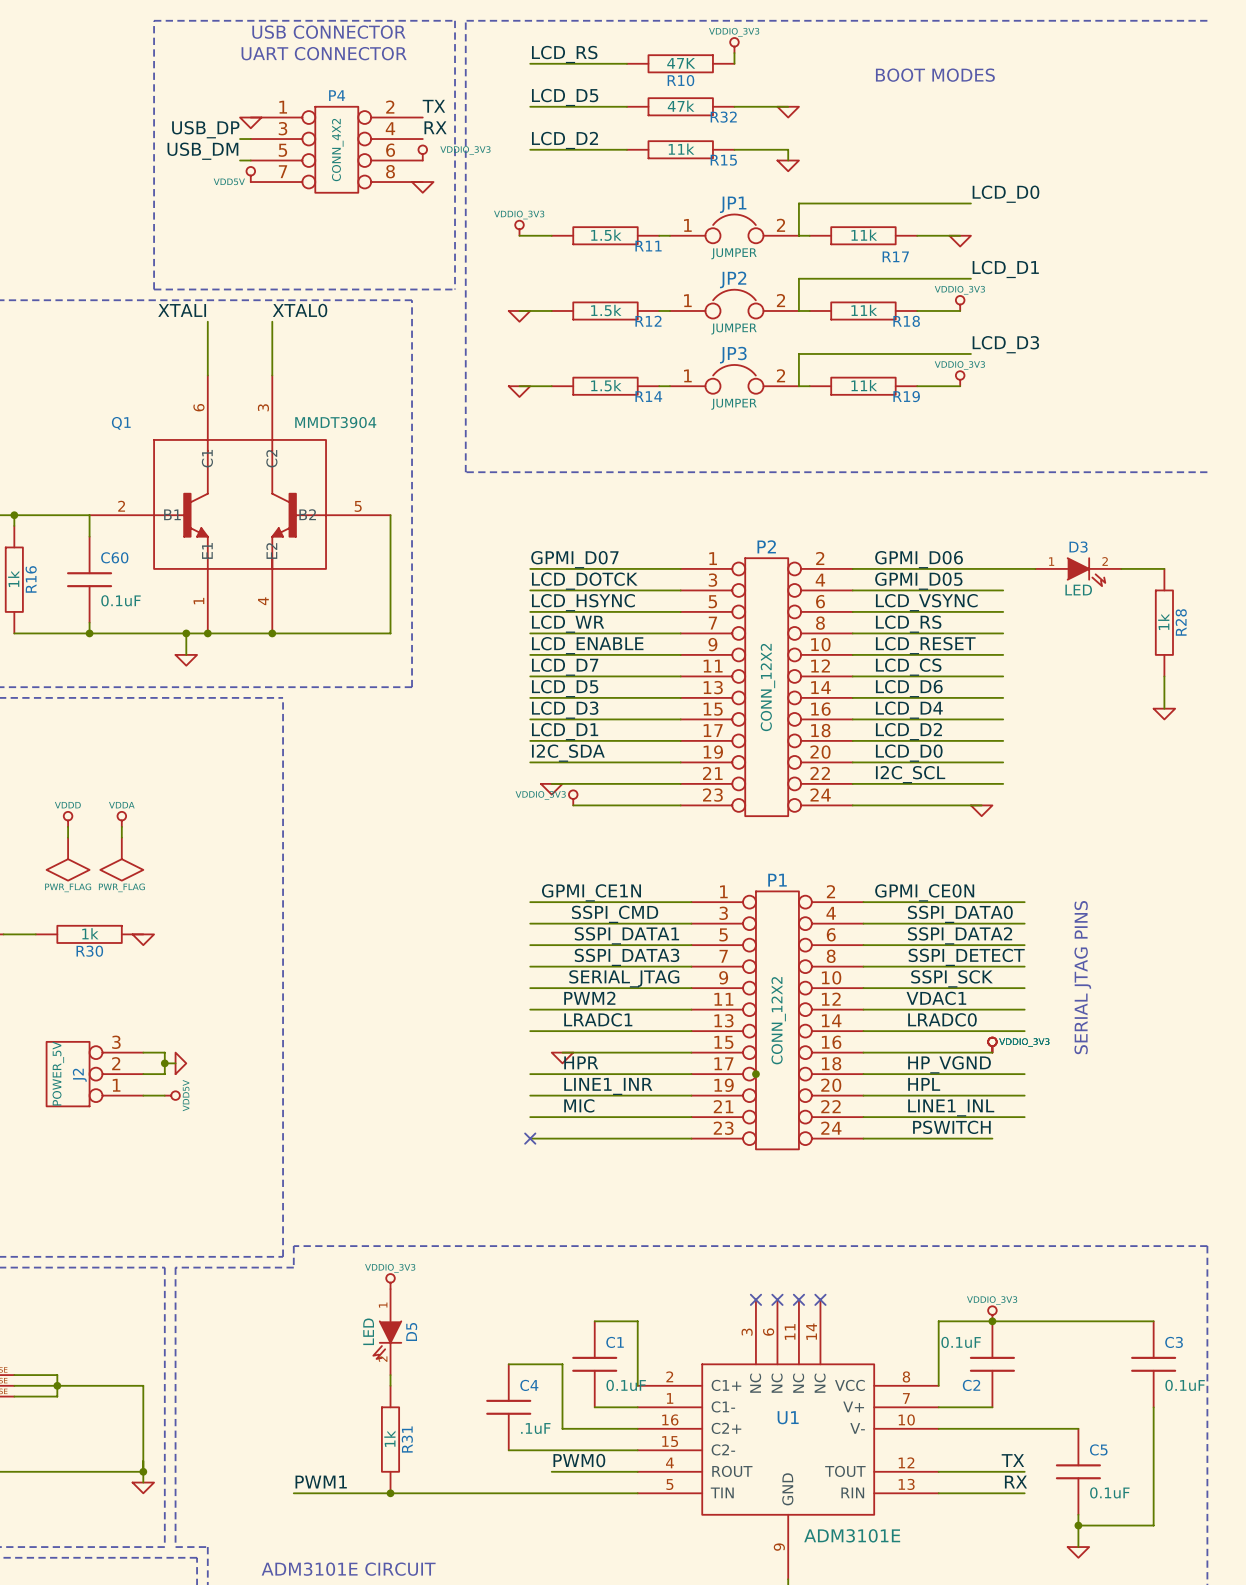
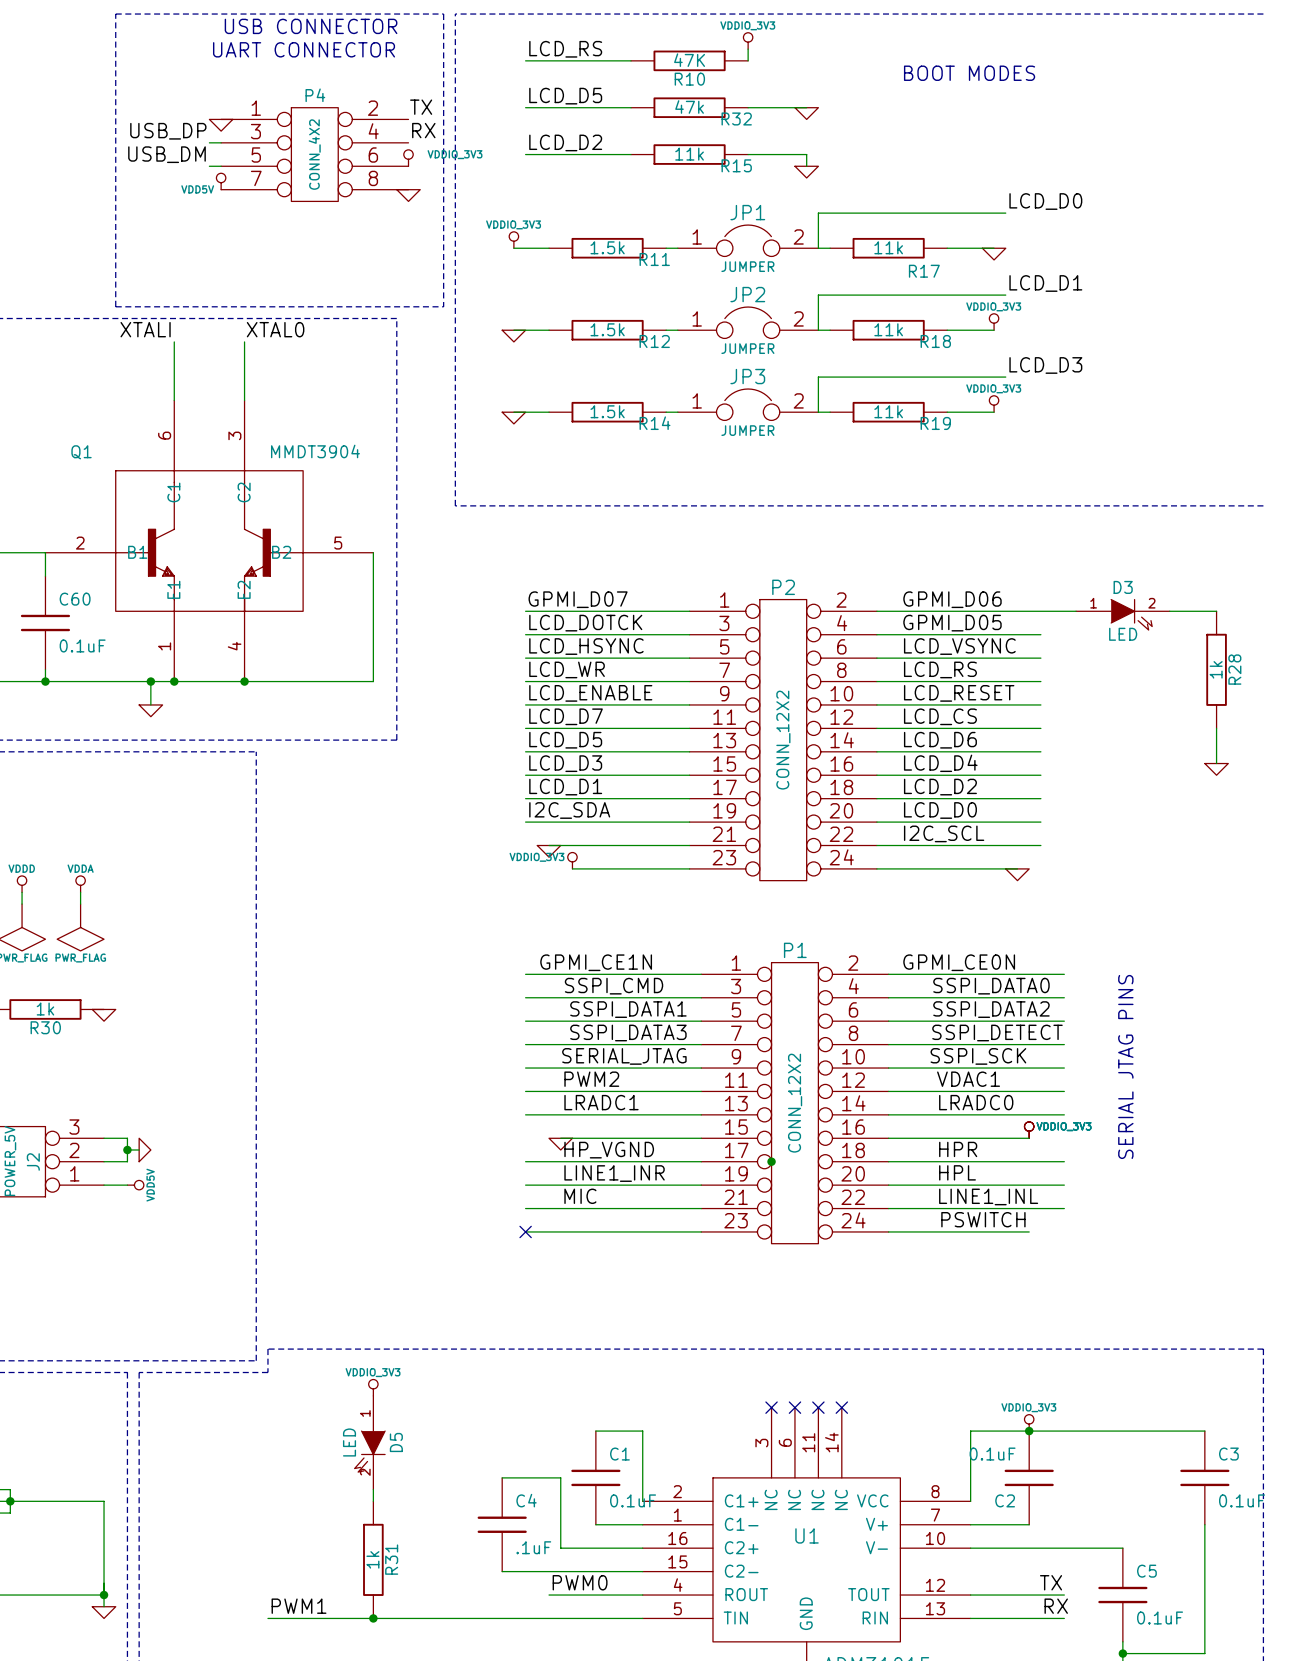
label: HPR (581, 1062) -> HP_VGND (609, 1150)
label: HP_VGND (949, 1064) -> HPR (958, 1149)

